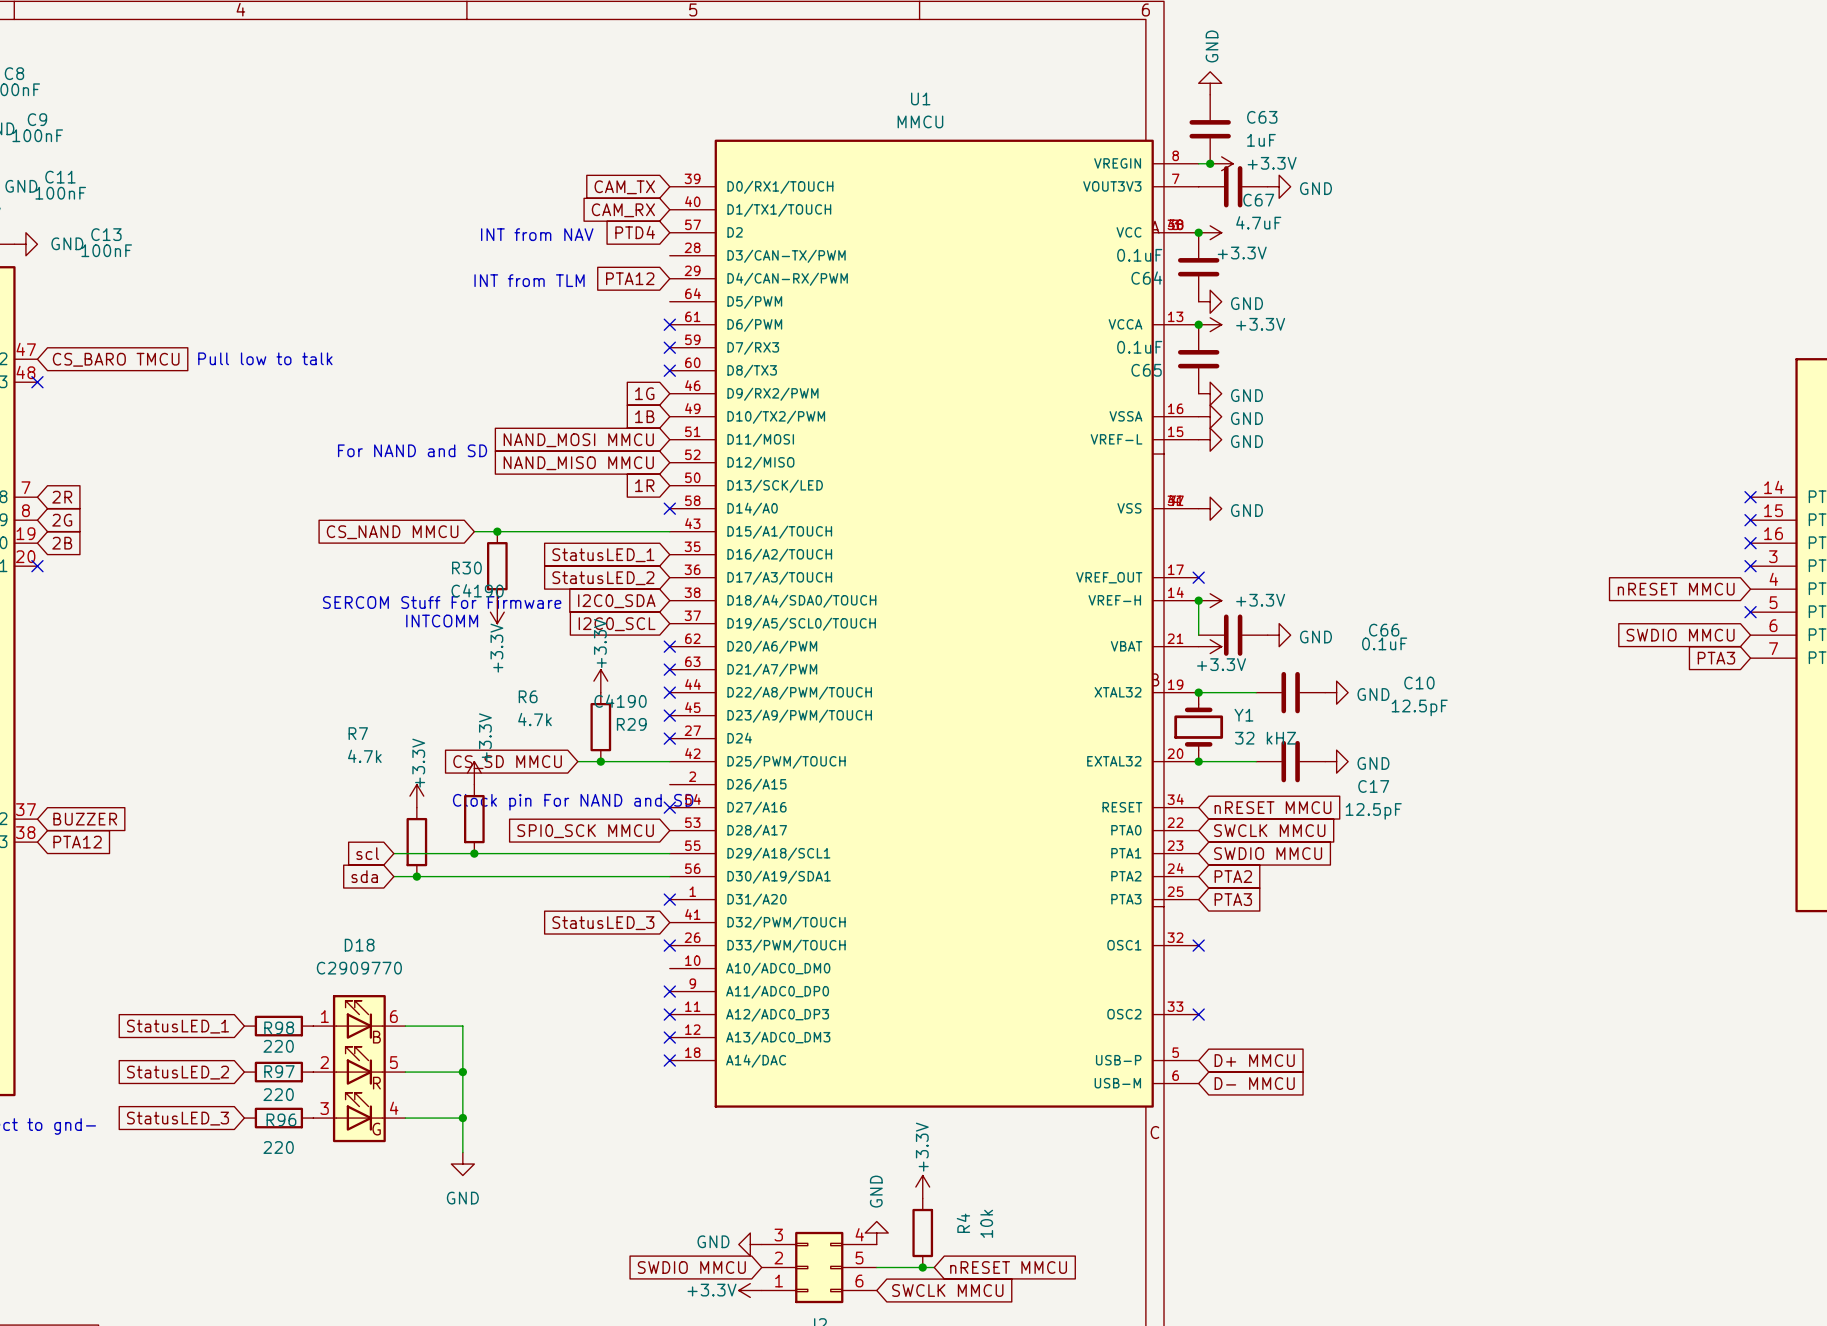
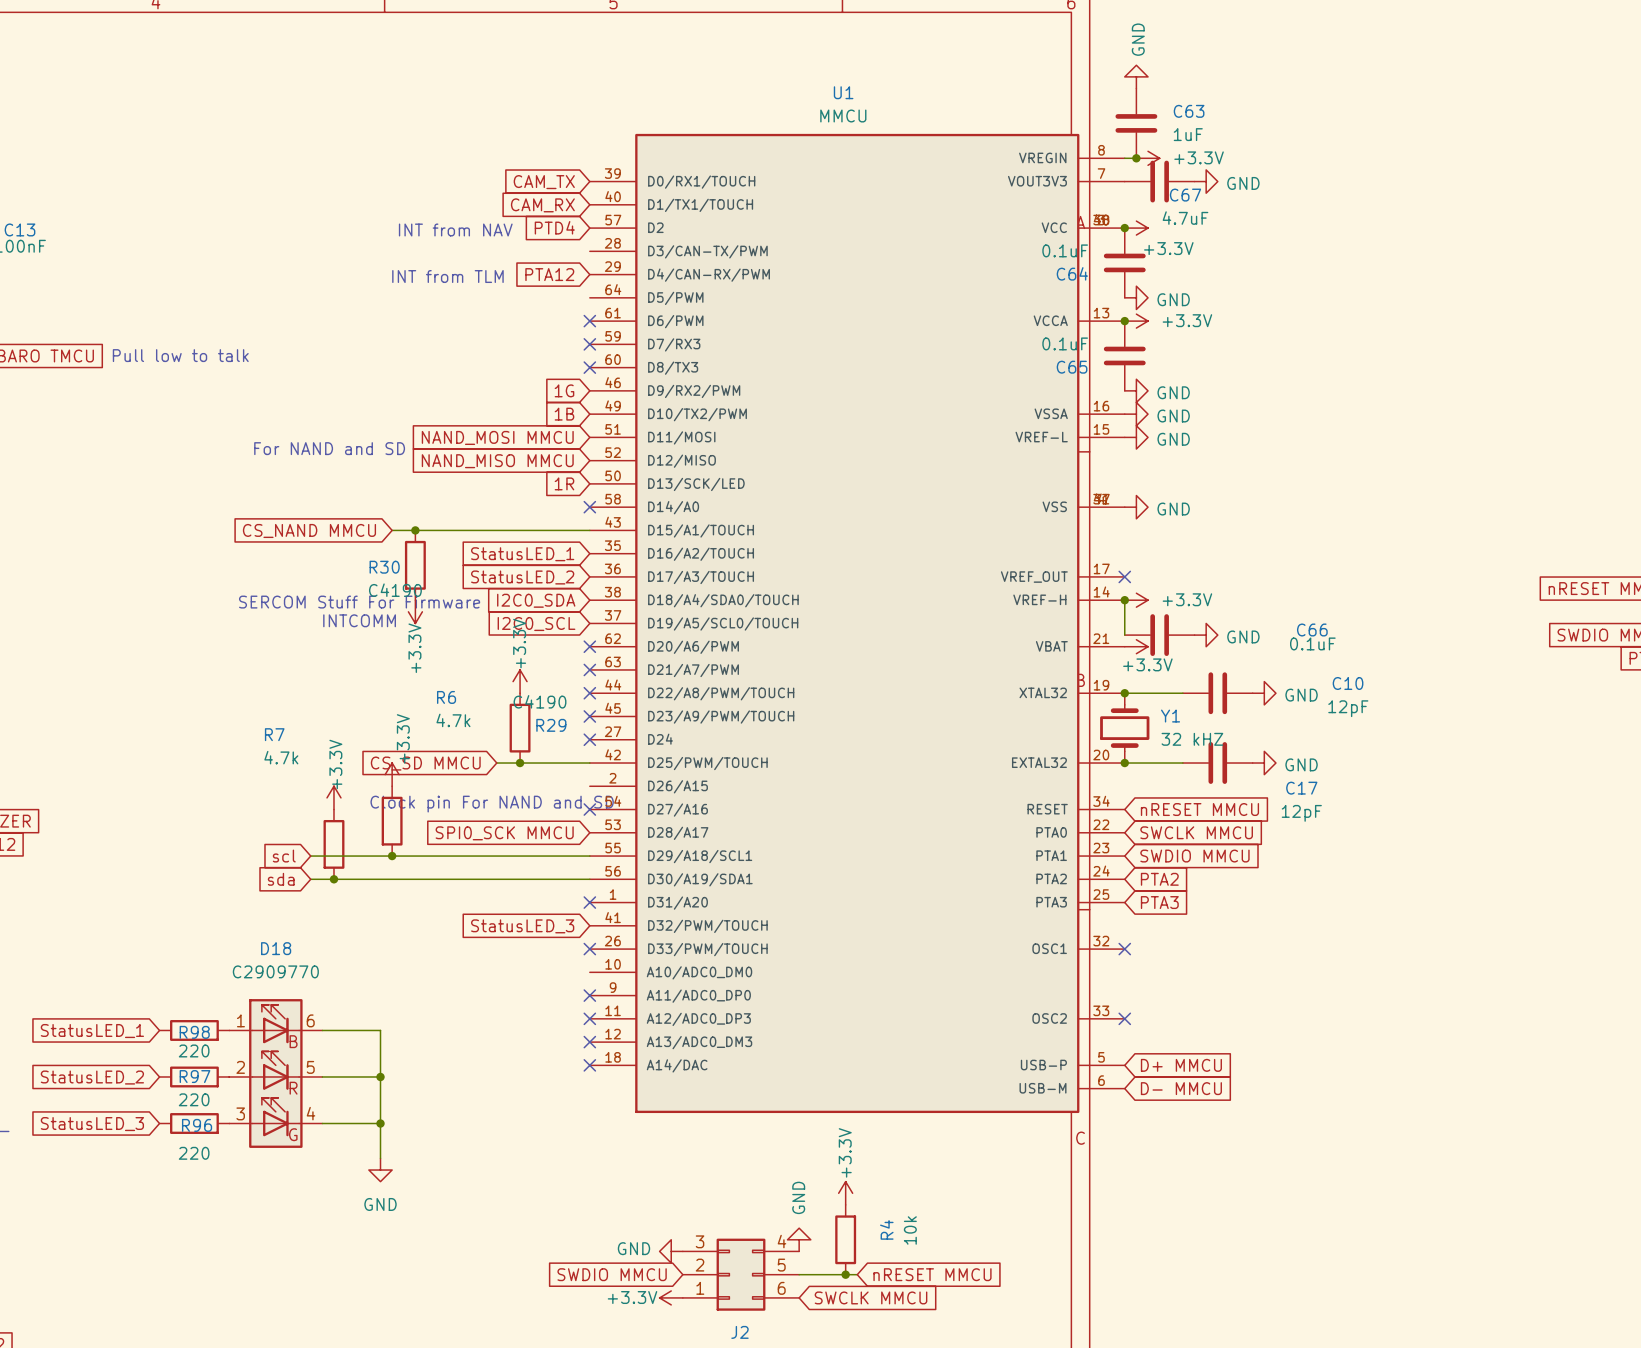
C10 value: 12.5pF (1419, 707) -> 12pF (1348, 708)
C17 value: 12.5pF (1373, 811) -> 12pF (1301, 813)

